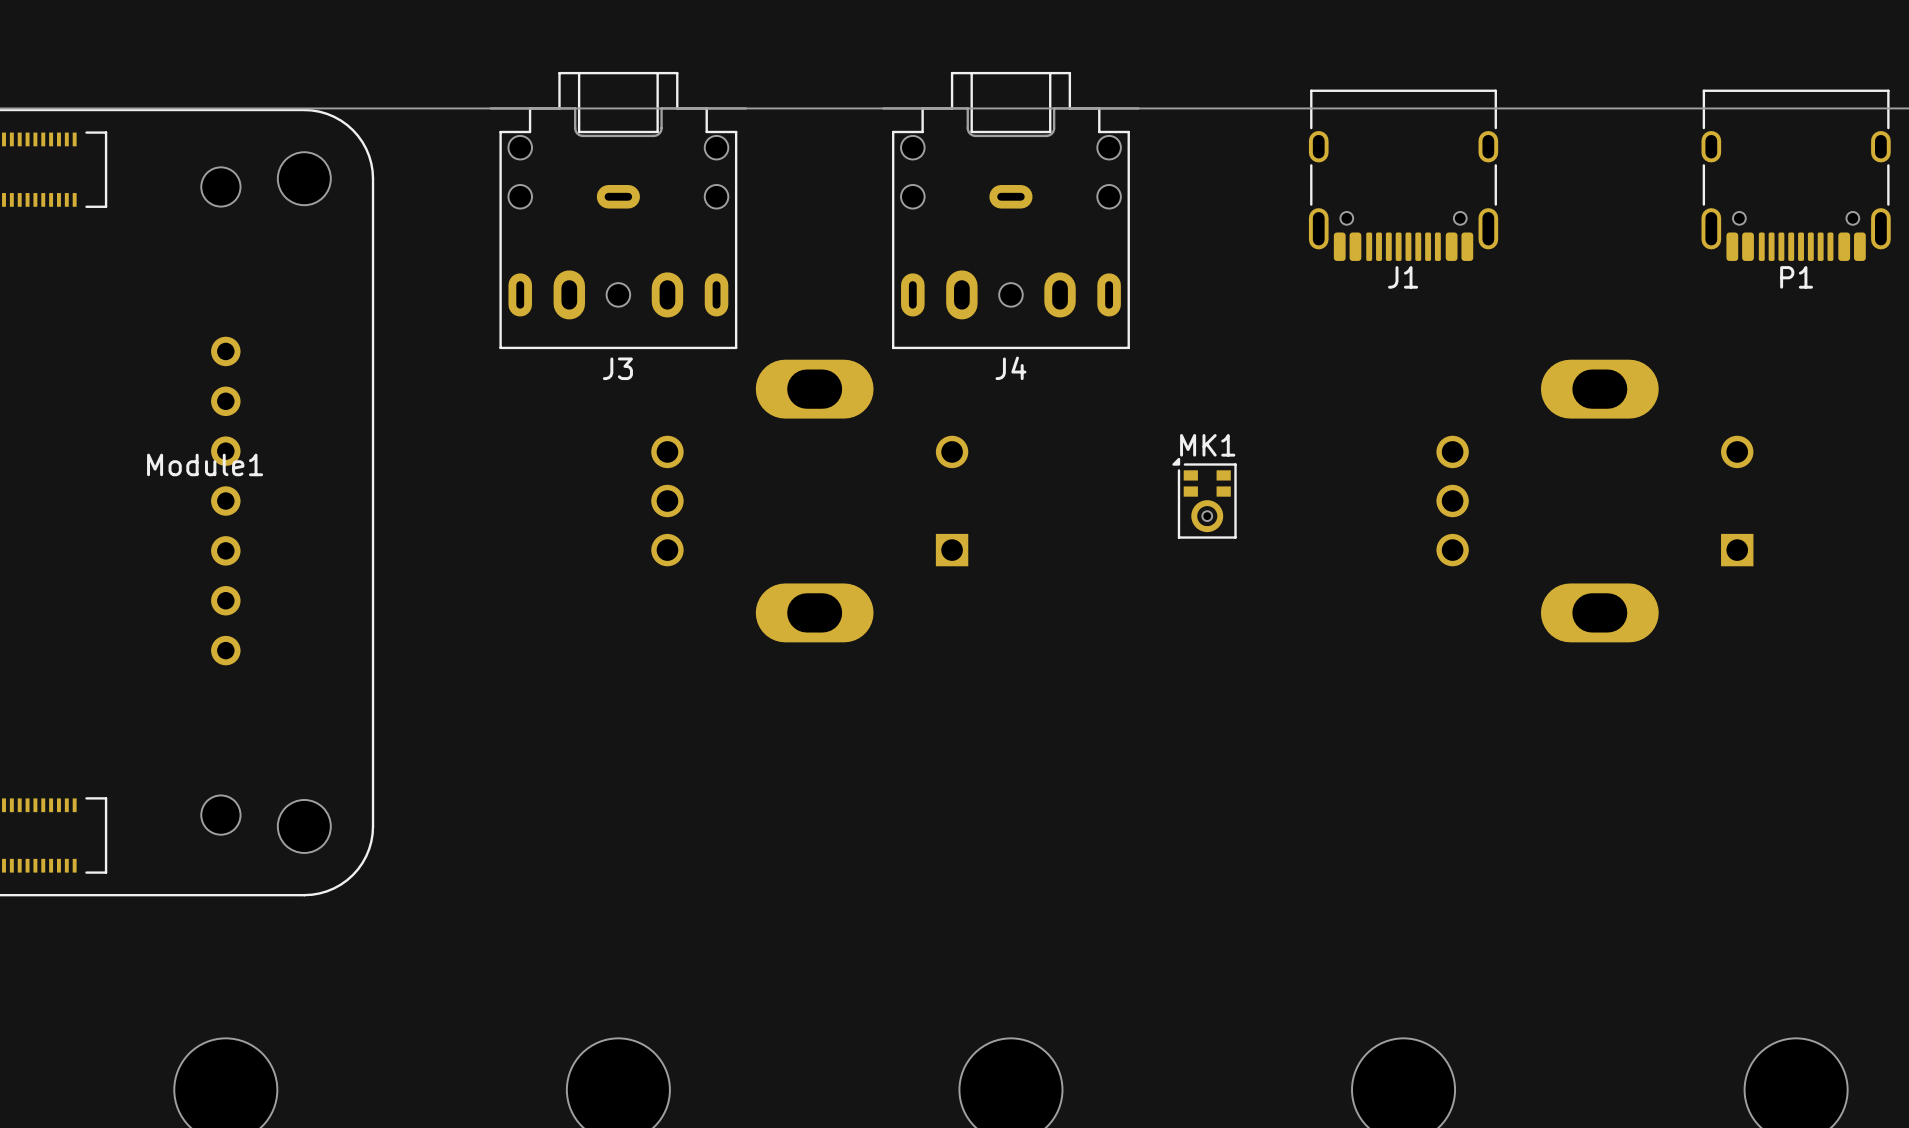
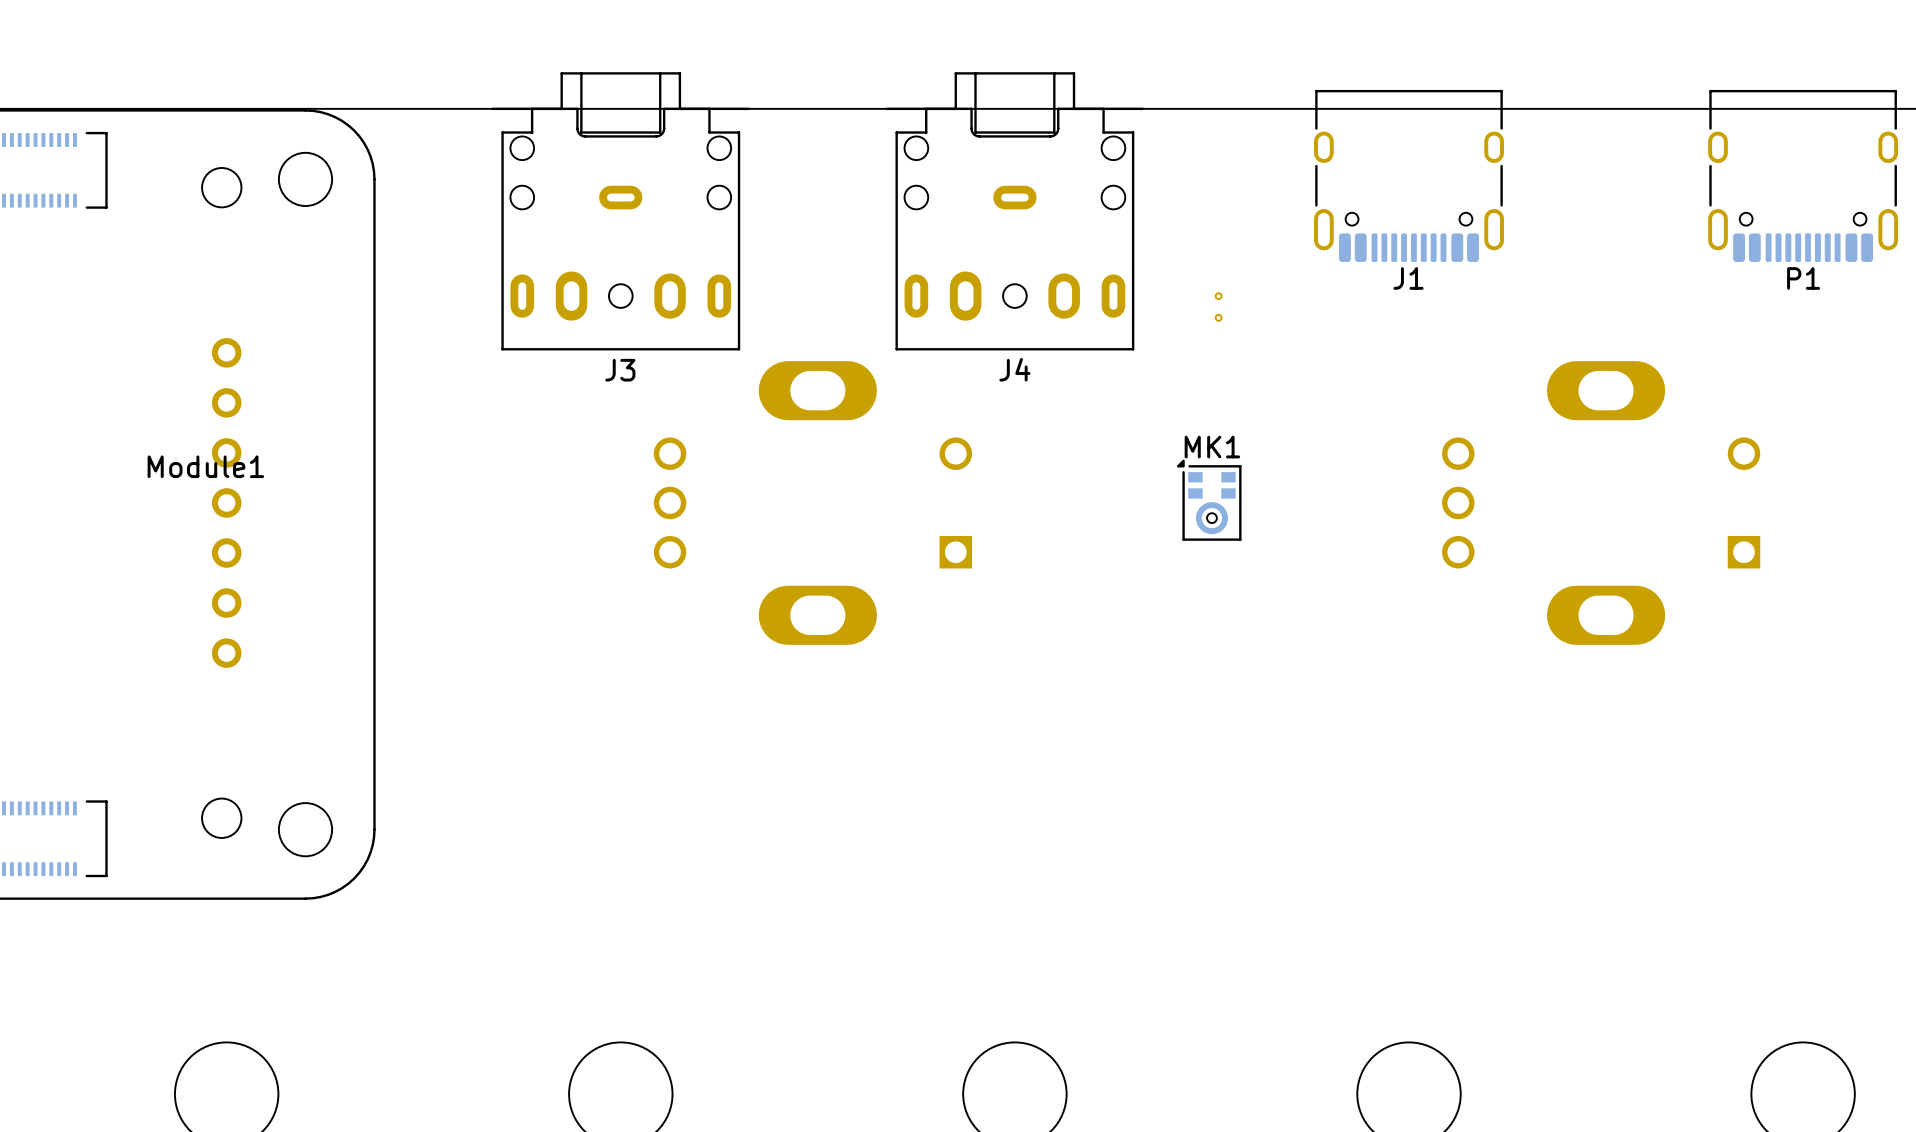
part: none -> (1218, 307)

